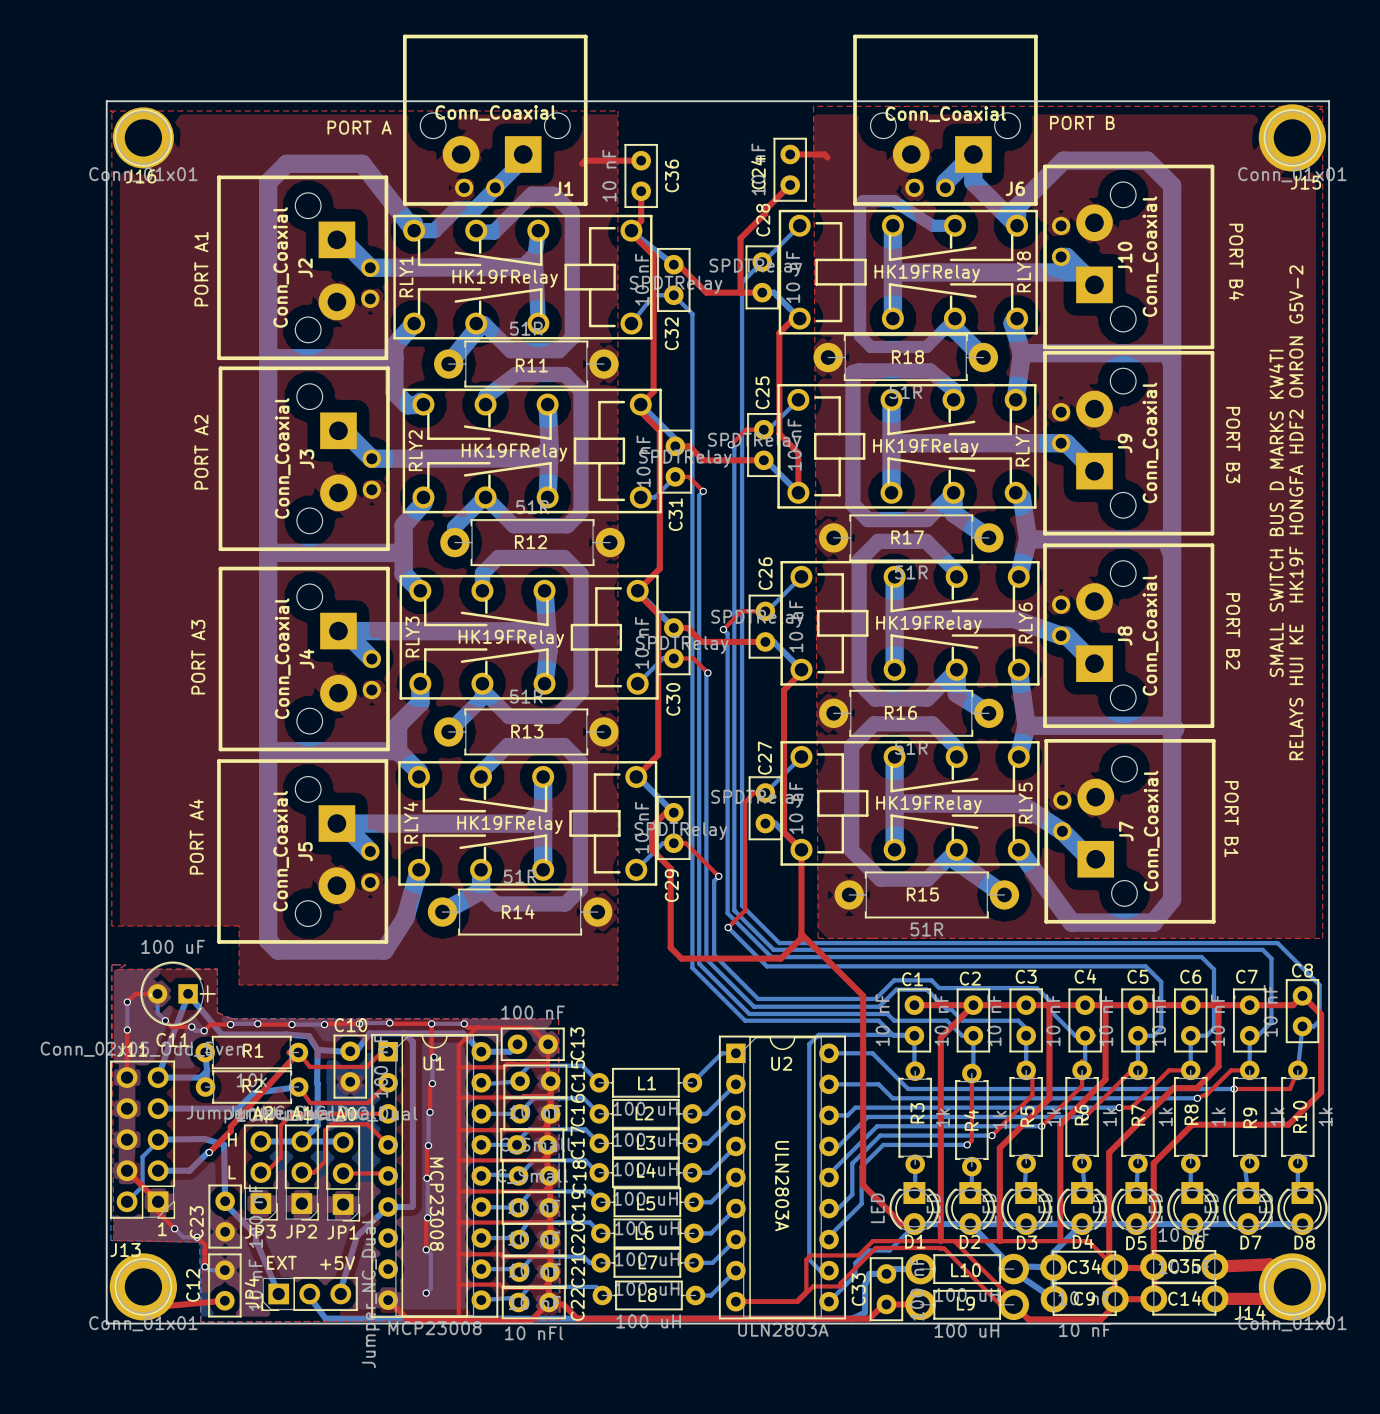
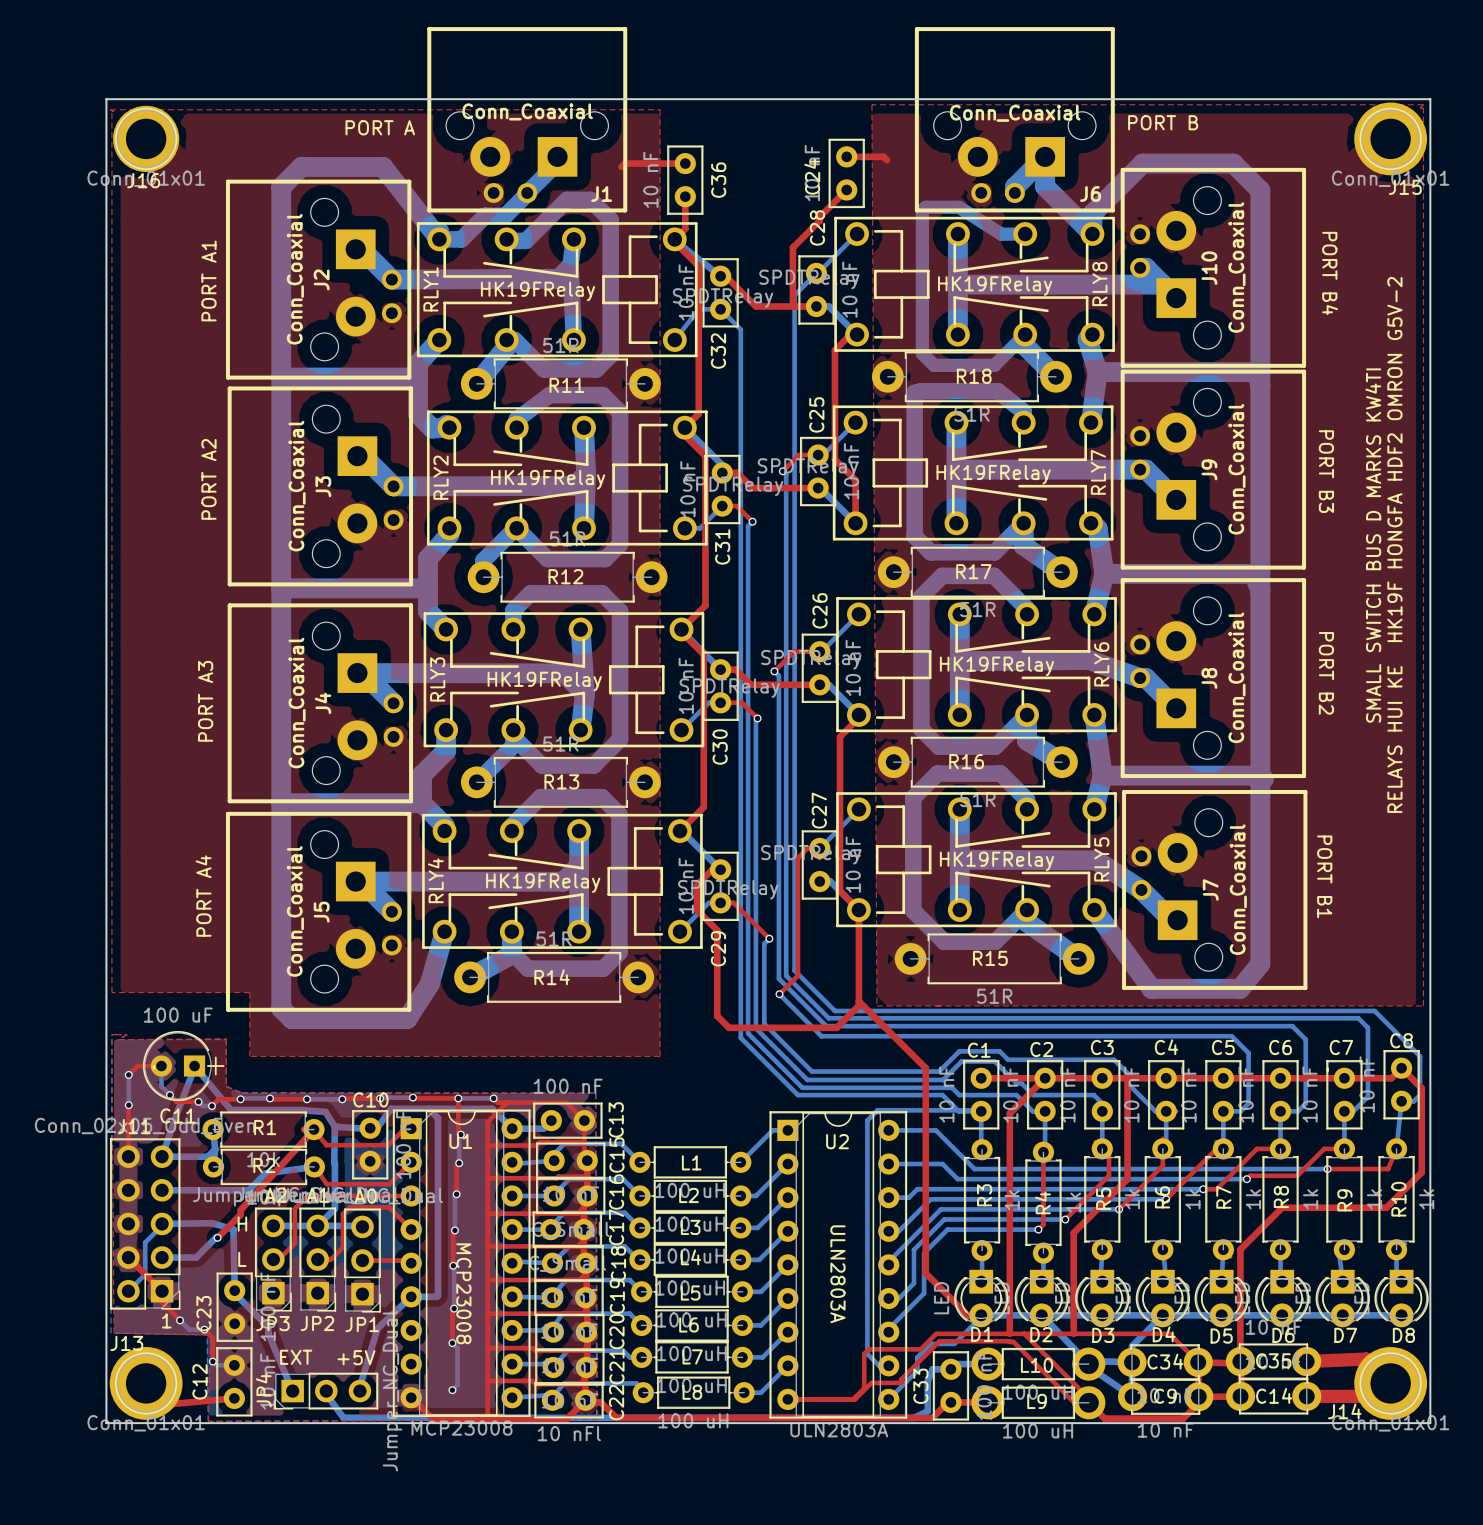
top track: (1105, 1005) (1105, 1079) (1060, 1124) (1060, 1241) -> none
top track: (1218, 1005) (1218, 1066) (1196, 1088) (1173, 1088) (1109, 1152) (1109, 1261) (1114, 1267) -> none
top track: (1206, 1095) (1197, 1098) -> (1297, 1175) (1250, 1175) (1246, 1179)
bottom track: (1159, 1098) (1197, 1098) -> none
via position: (1197, 1098) -> (1246, 1179)

